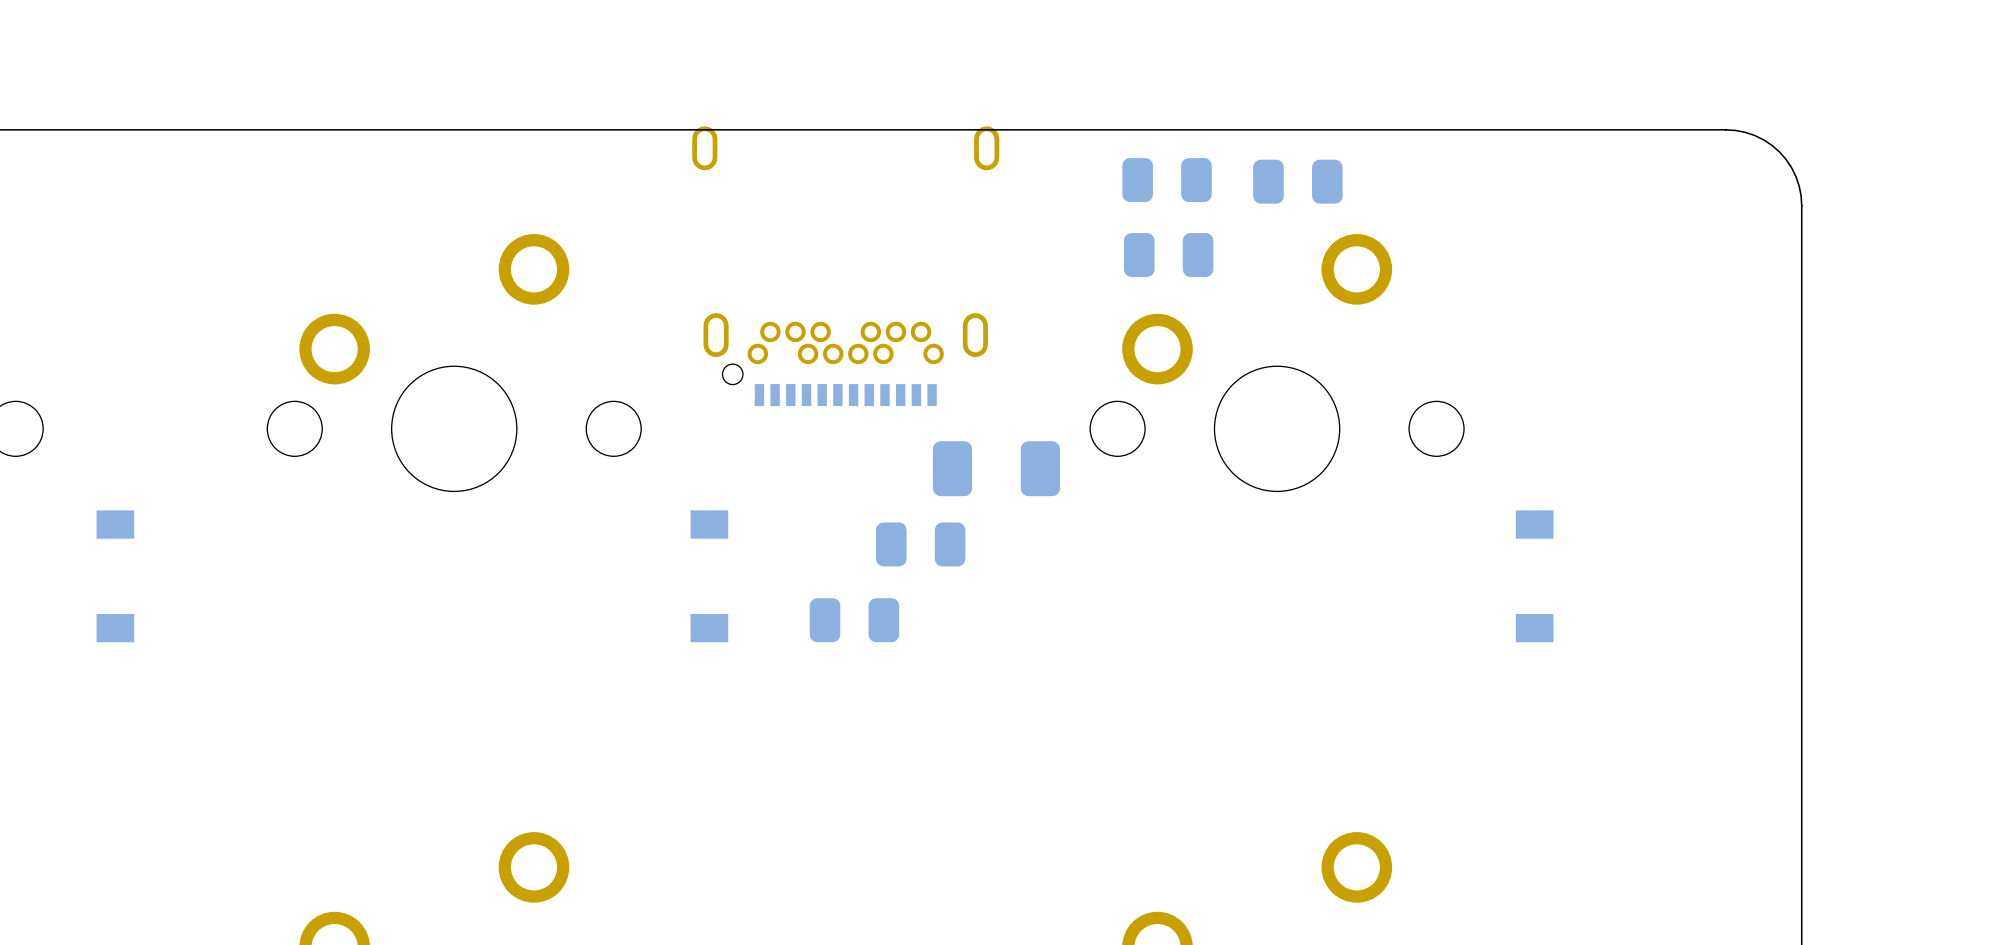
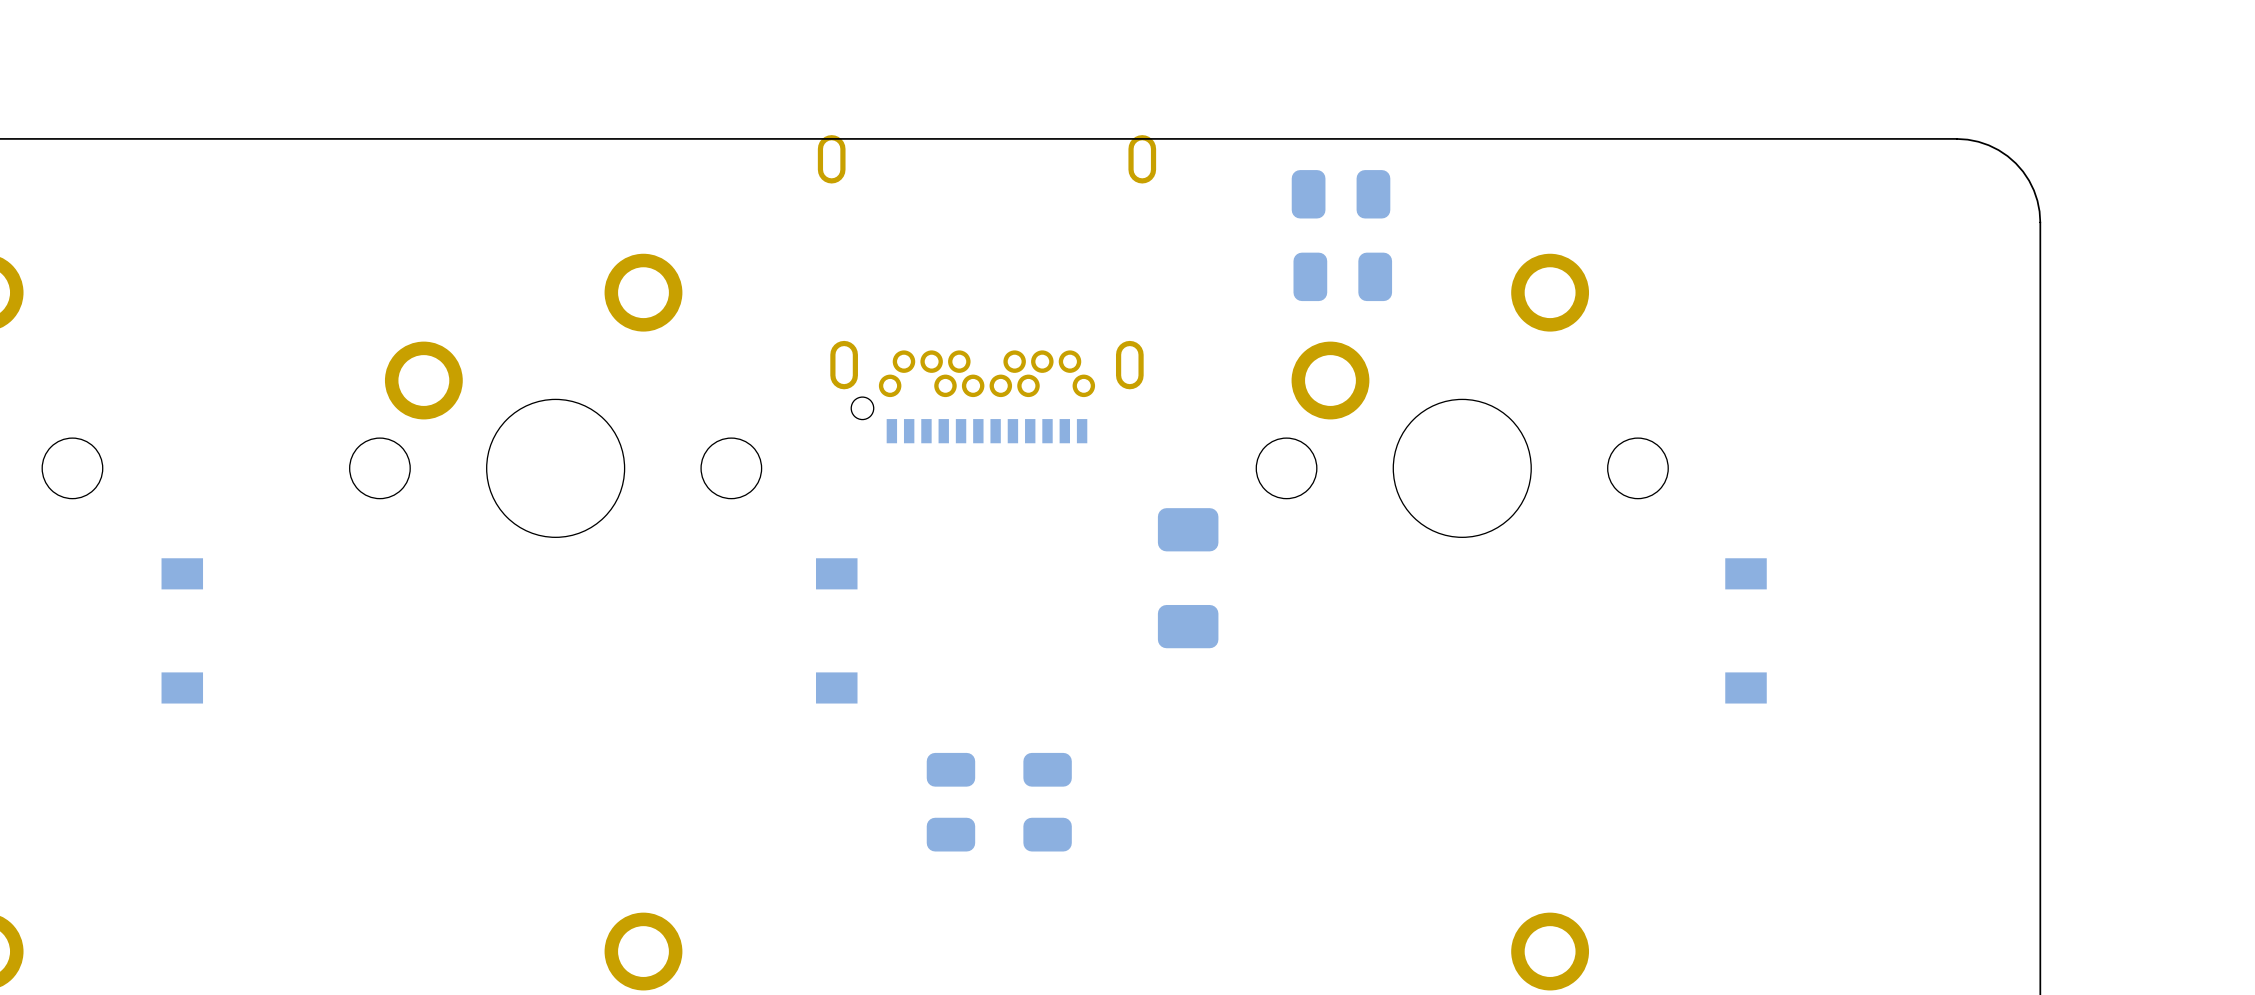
part: (1297, 181) -> none
part rotation: 0° (996, 468) -> 90° clockwise (1188, 578)
part: (920, 544) -> none
part: (854, 620) -> none
part: none -> (950, 802)
part: none -> (1047, 802)

